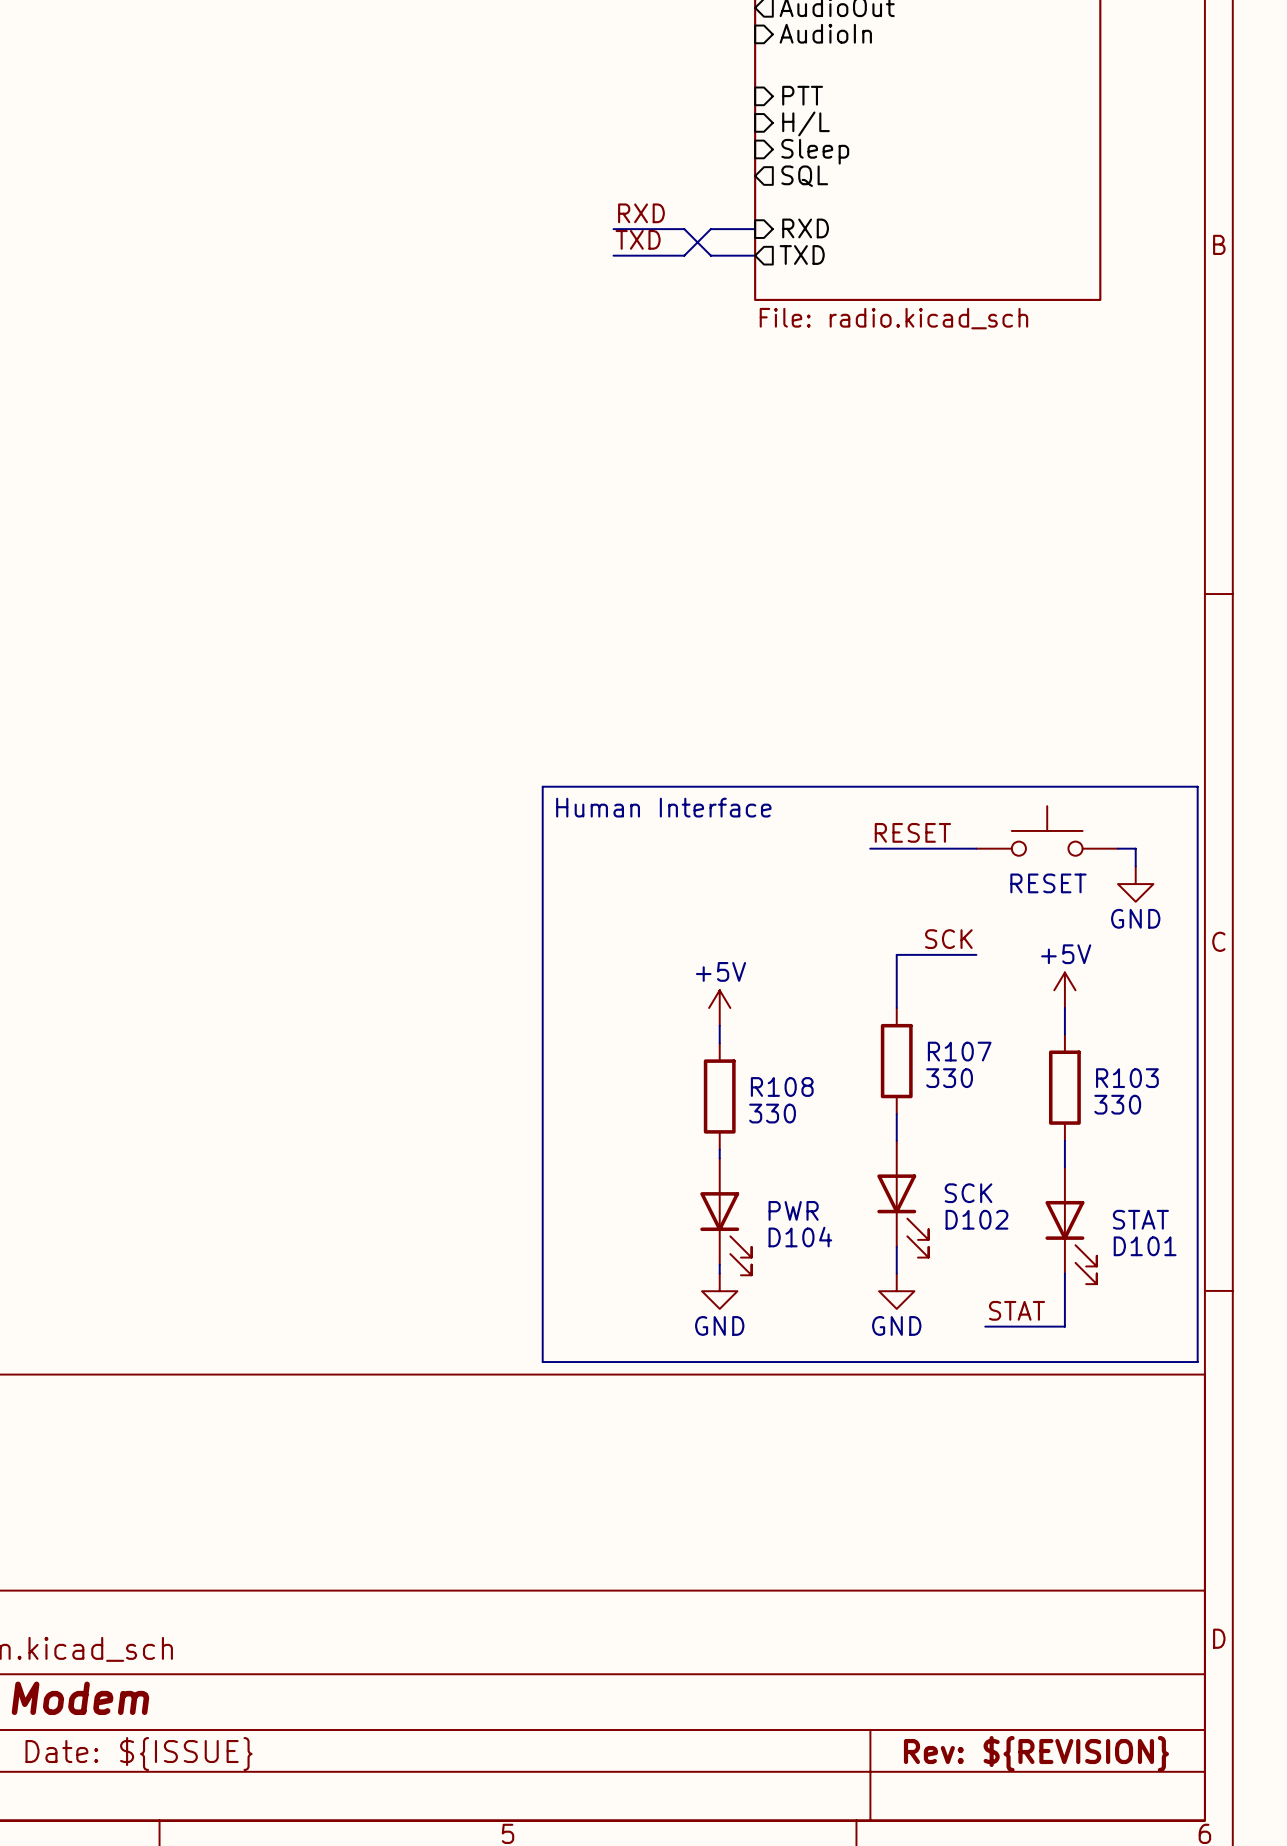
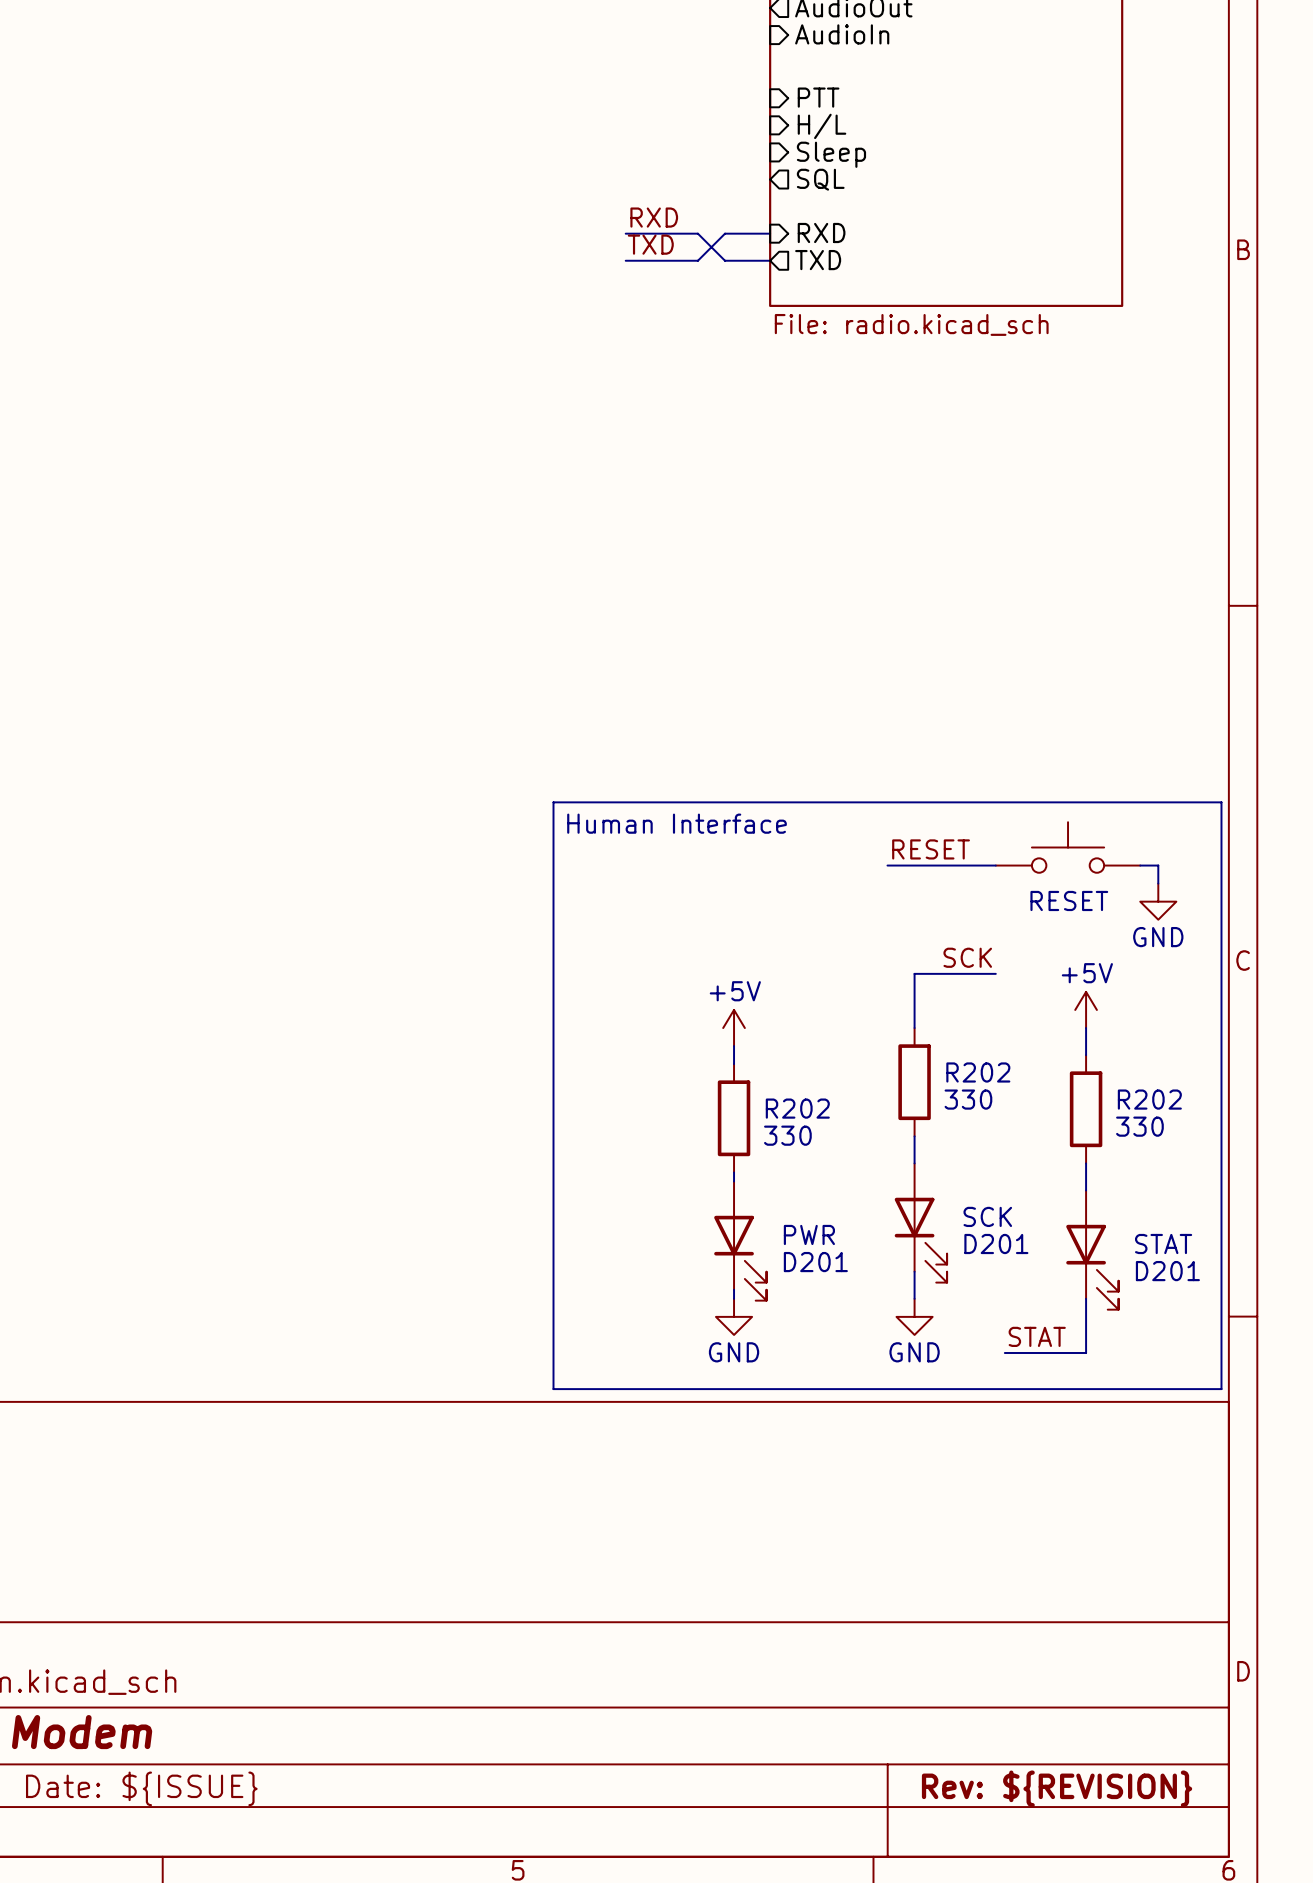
R107 name: R107 (959, 1051) -> R202 (978, 1072)
R103 name: R103 (1127, 1078) -> R202 (1149, 1099)
R108 name: R108 (782, 1086) -> R202 (797, 1108)
D102 name: D102 (976, 1219) -> D201 (996, 1244)
D104 name: D104 (800, 1237) -> D201 (815, 1262)
D101 name: D101 (1145, 1246) -> D201 (1167, 1271)

